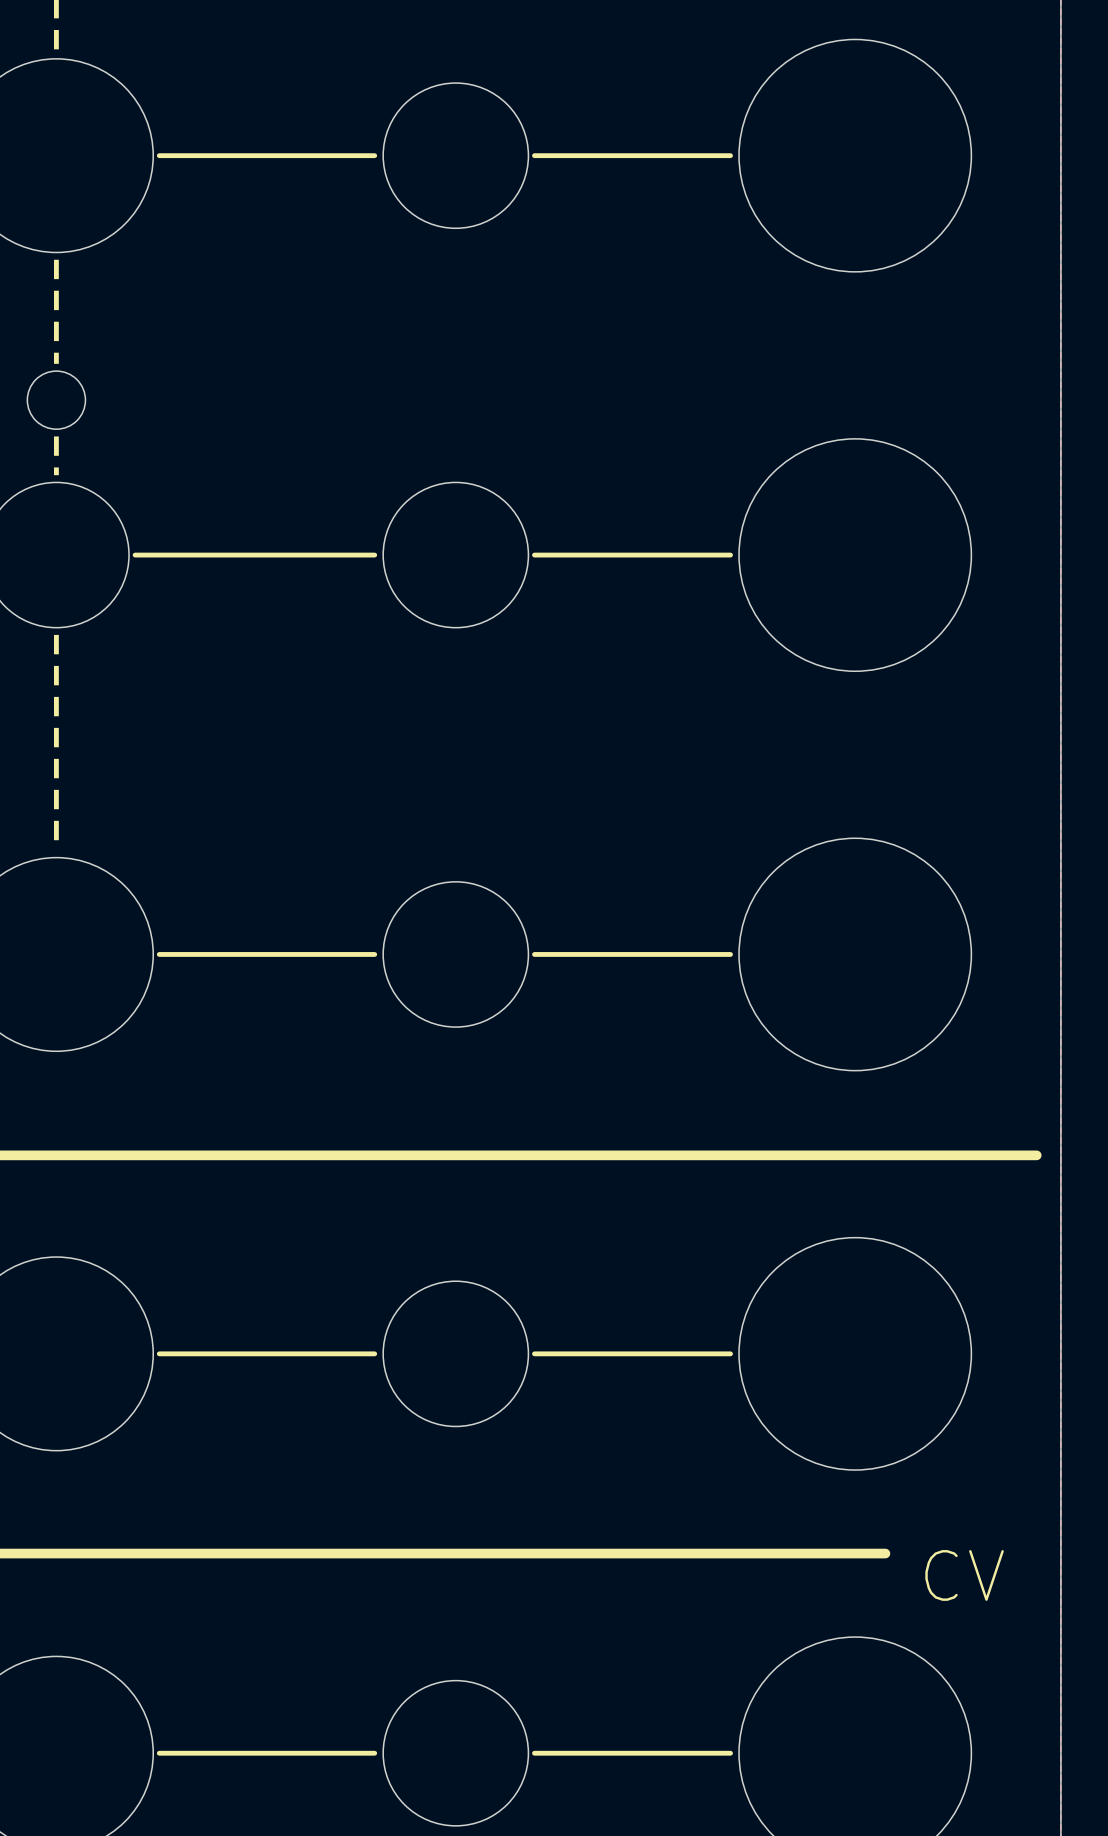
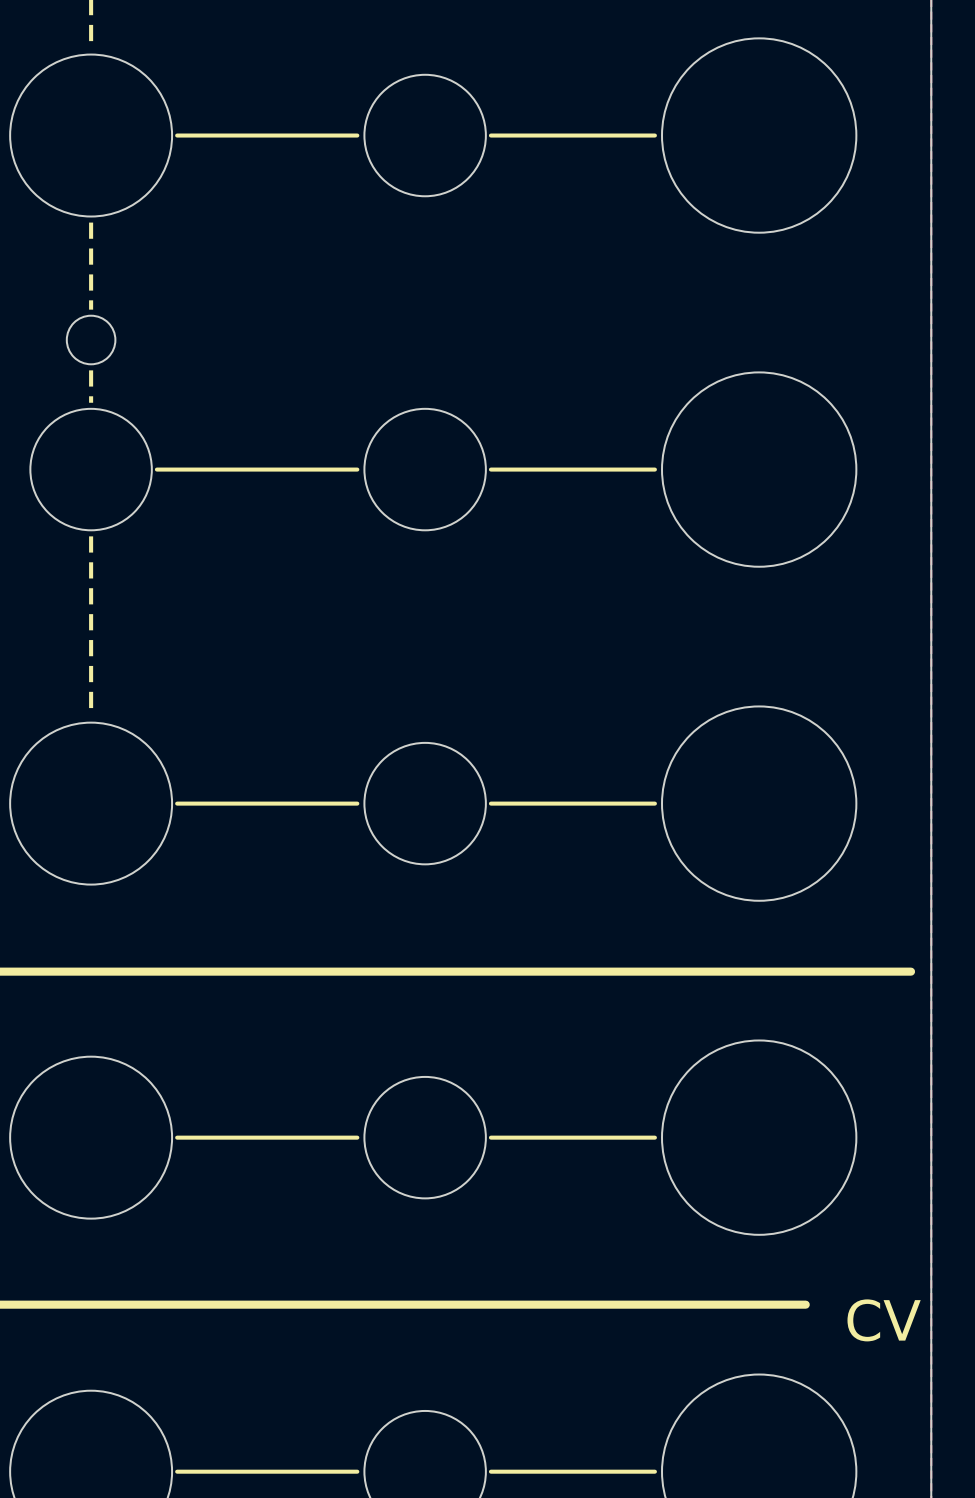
line: none -> (784, 1304) (805, 1304)
text position: CV (964, 1575) -> CV (884, 1320)

